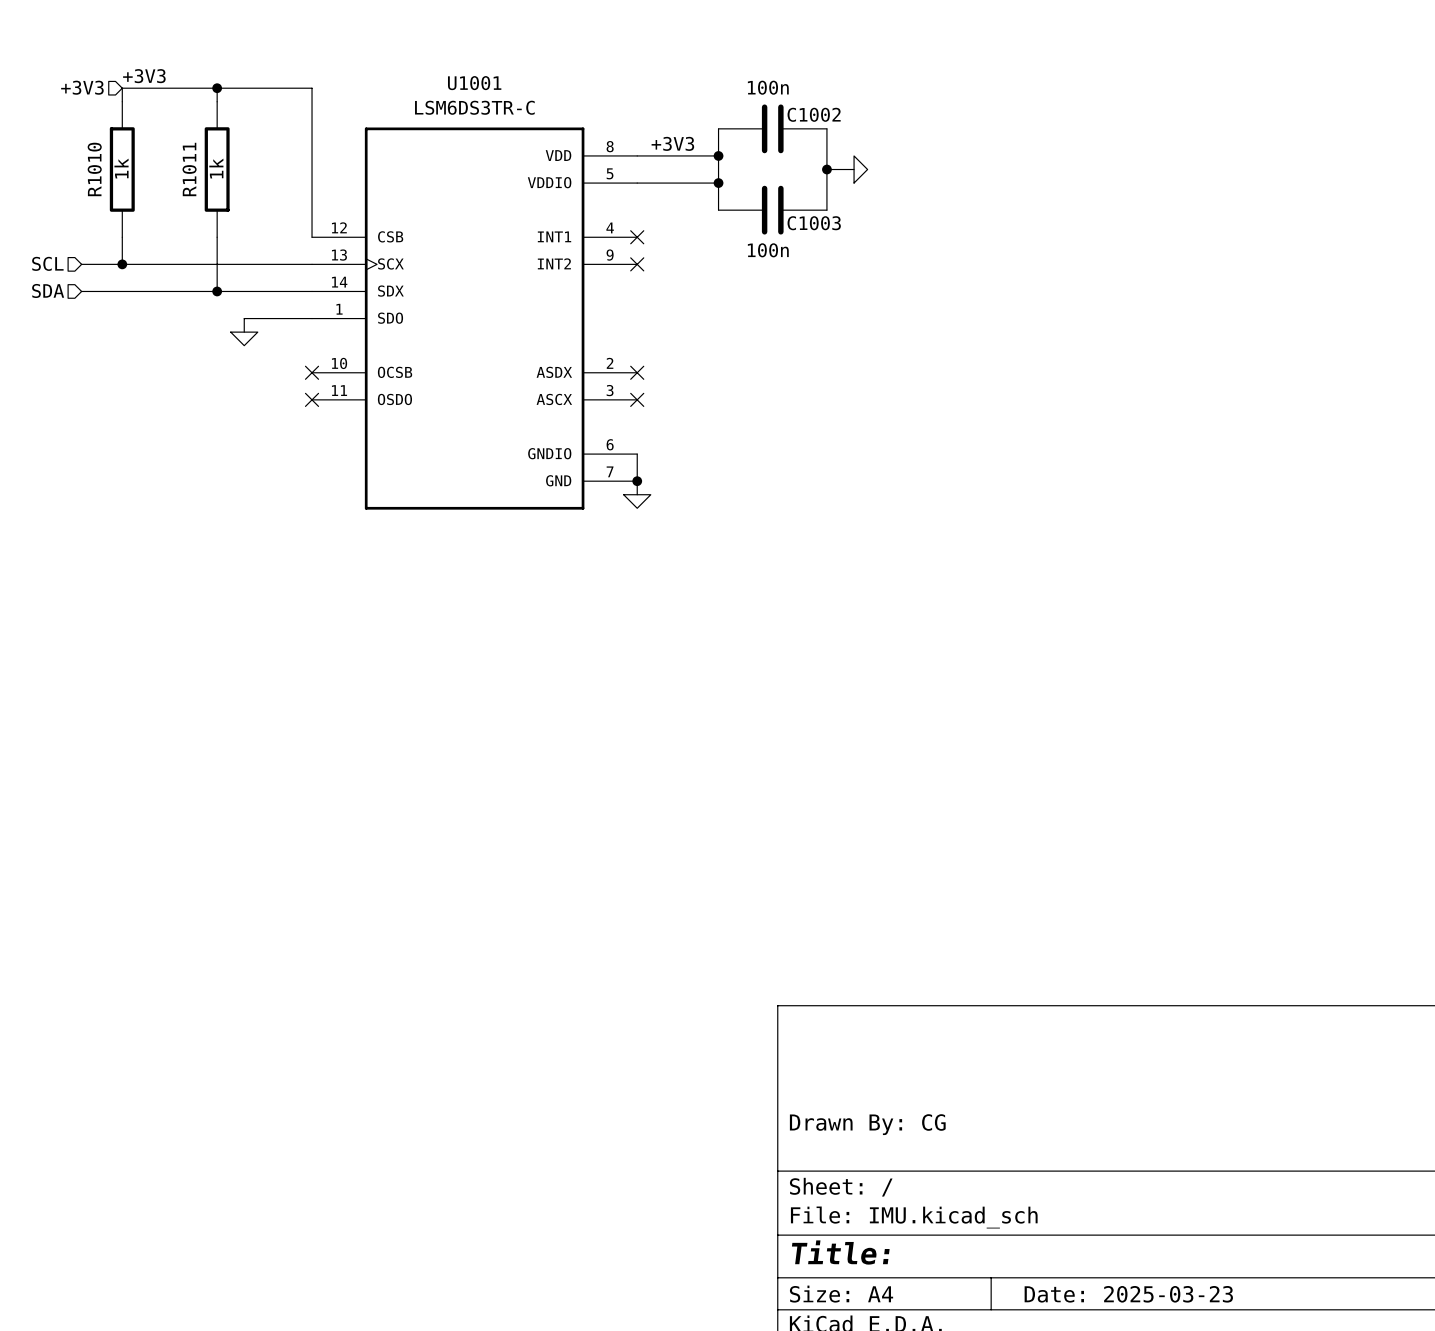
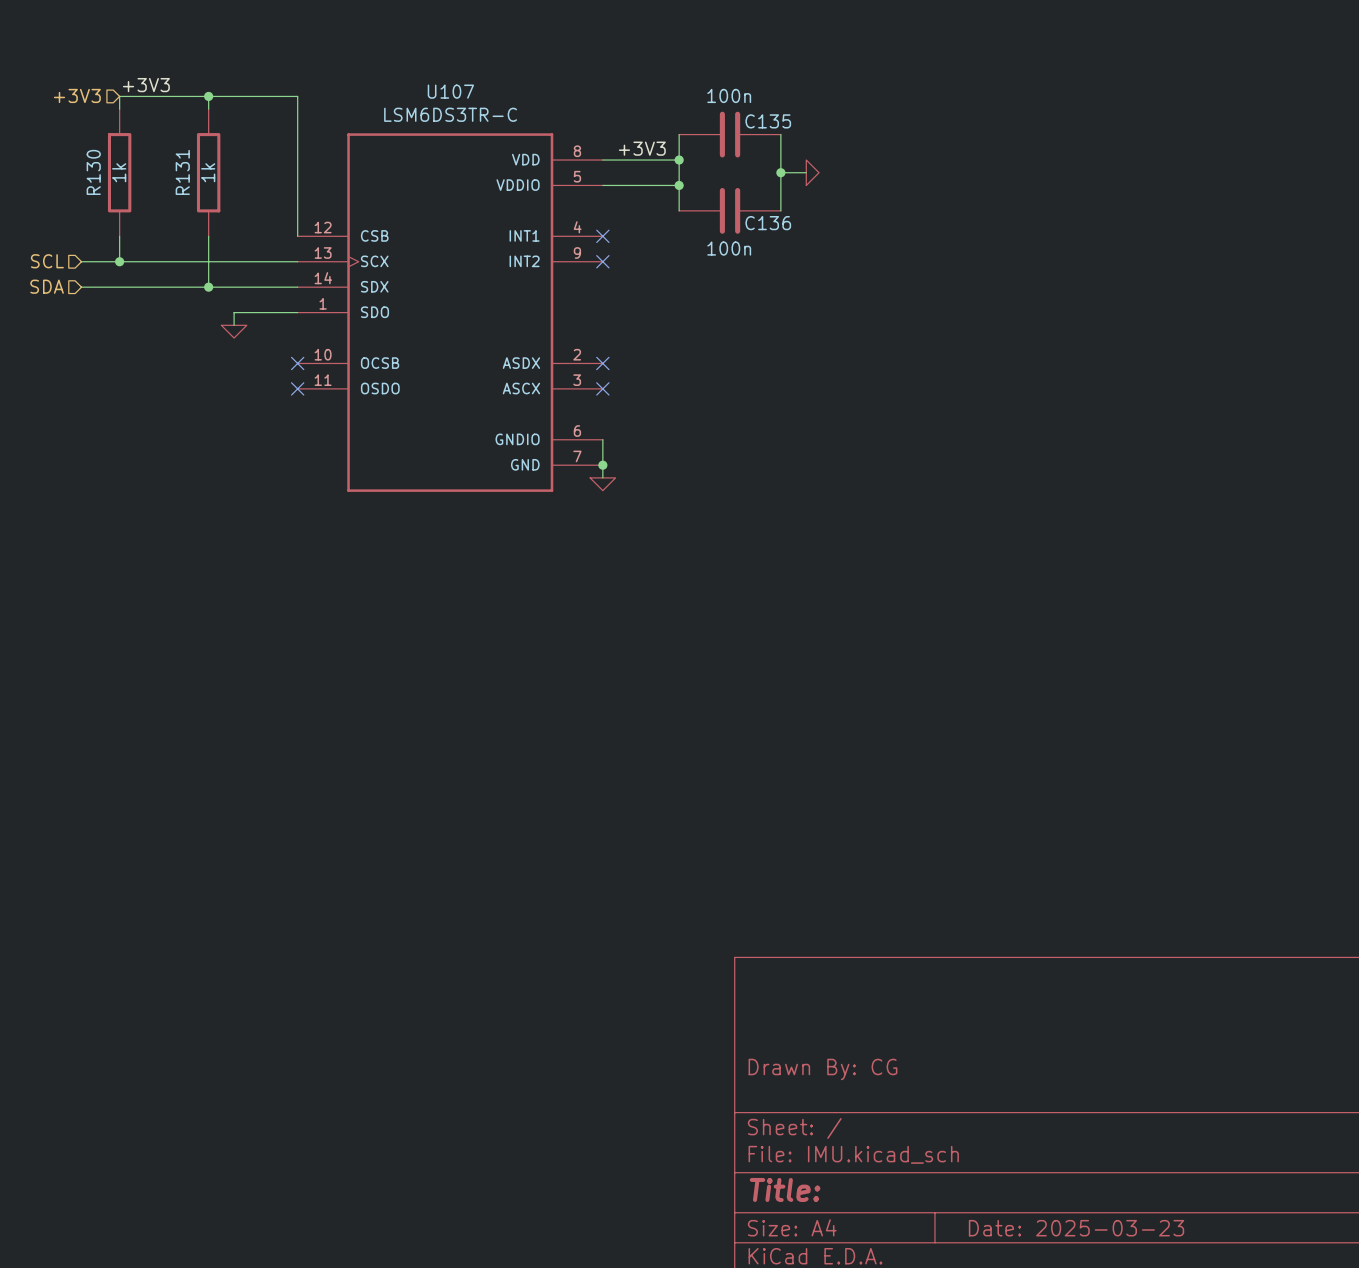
U1001 name: U1001 (474, 83) -> U107 (450, 91)
C1002 name: C1002 (814, 114) -> C135 (768, 121)
R1010 name: R1010 (94, 169) -> R130 (93, 172)
R1011 name: R1011 (189, 169) -> R131 (182, 172)
C1003 name: C1003 (814, 223) -> C136 (768, 223)

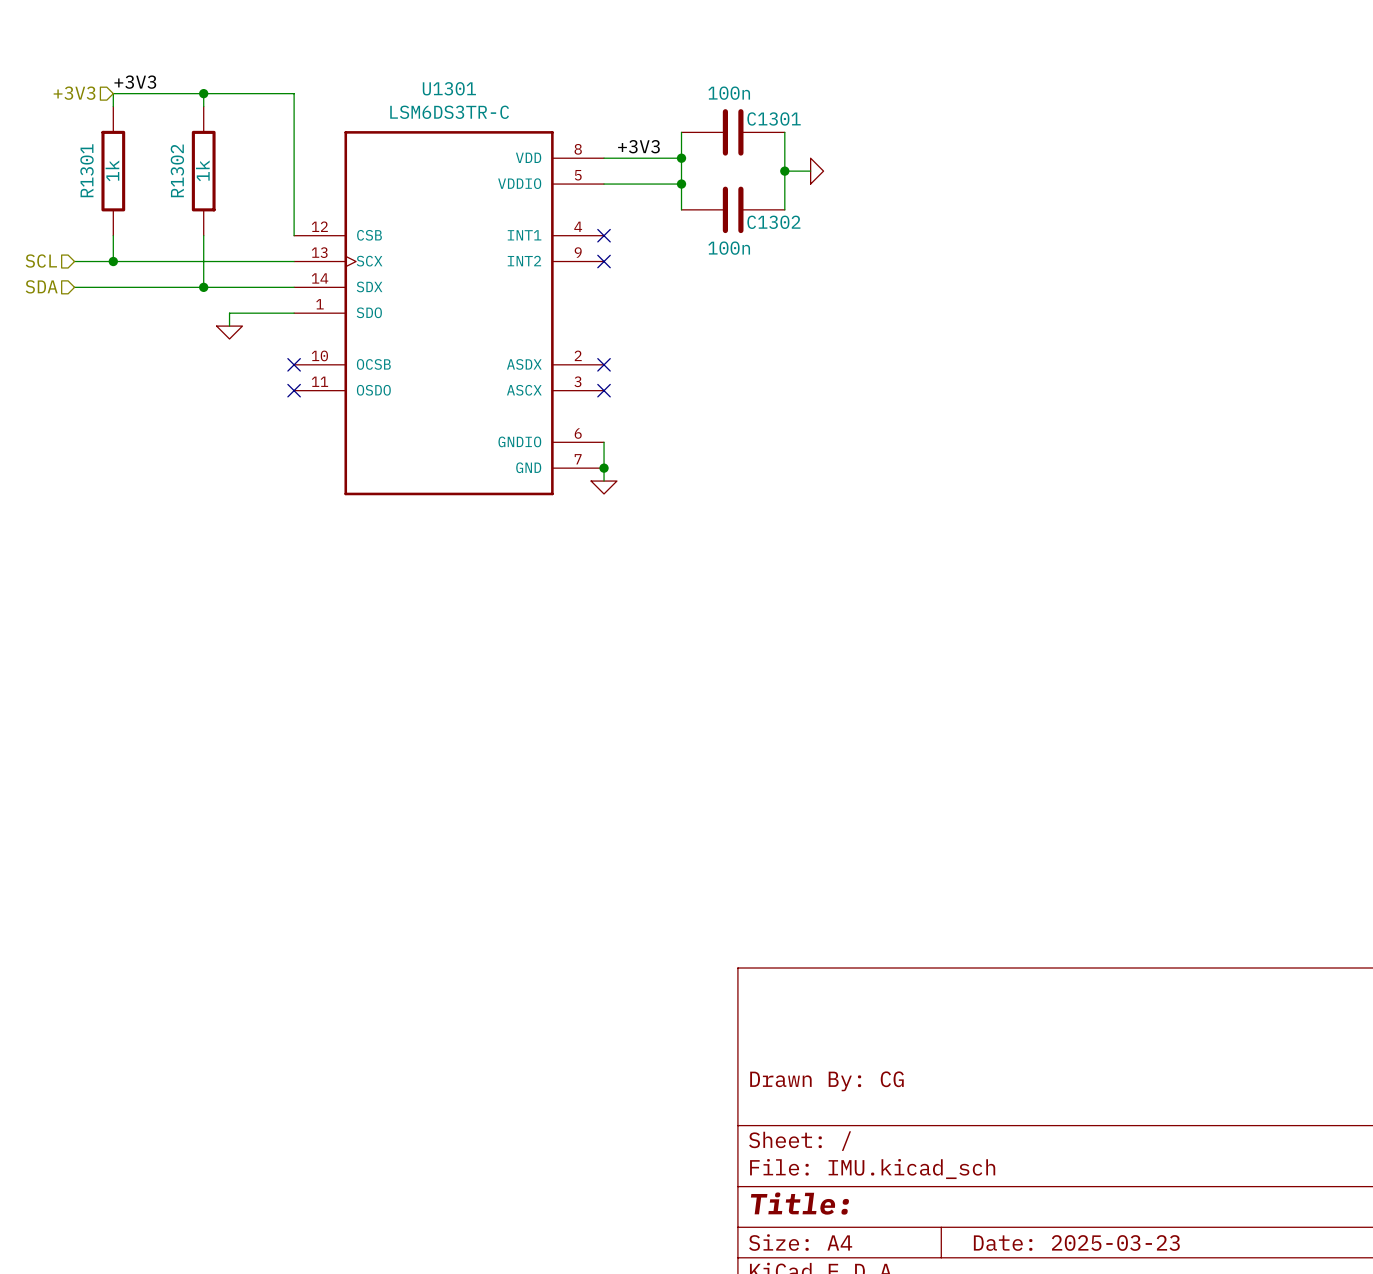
U107 name: U107 (450, 91) -> U1301 (449, 88)
C135 name: C135 (768, 121) -> C1301 (774, 118)
R130 name: R130 (93, 172) -> R1301 (87, 170)
R131 name: R131 (182, 172) -> R1302 (177, 170)
C136 name: C136 (768, 223) -> C1302 (773, 222)

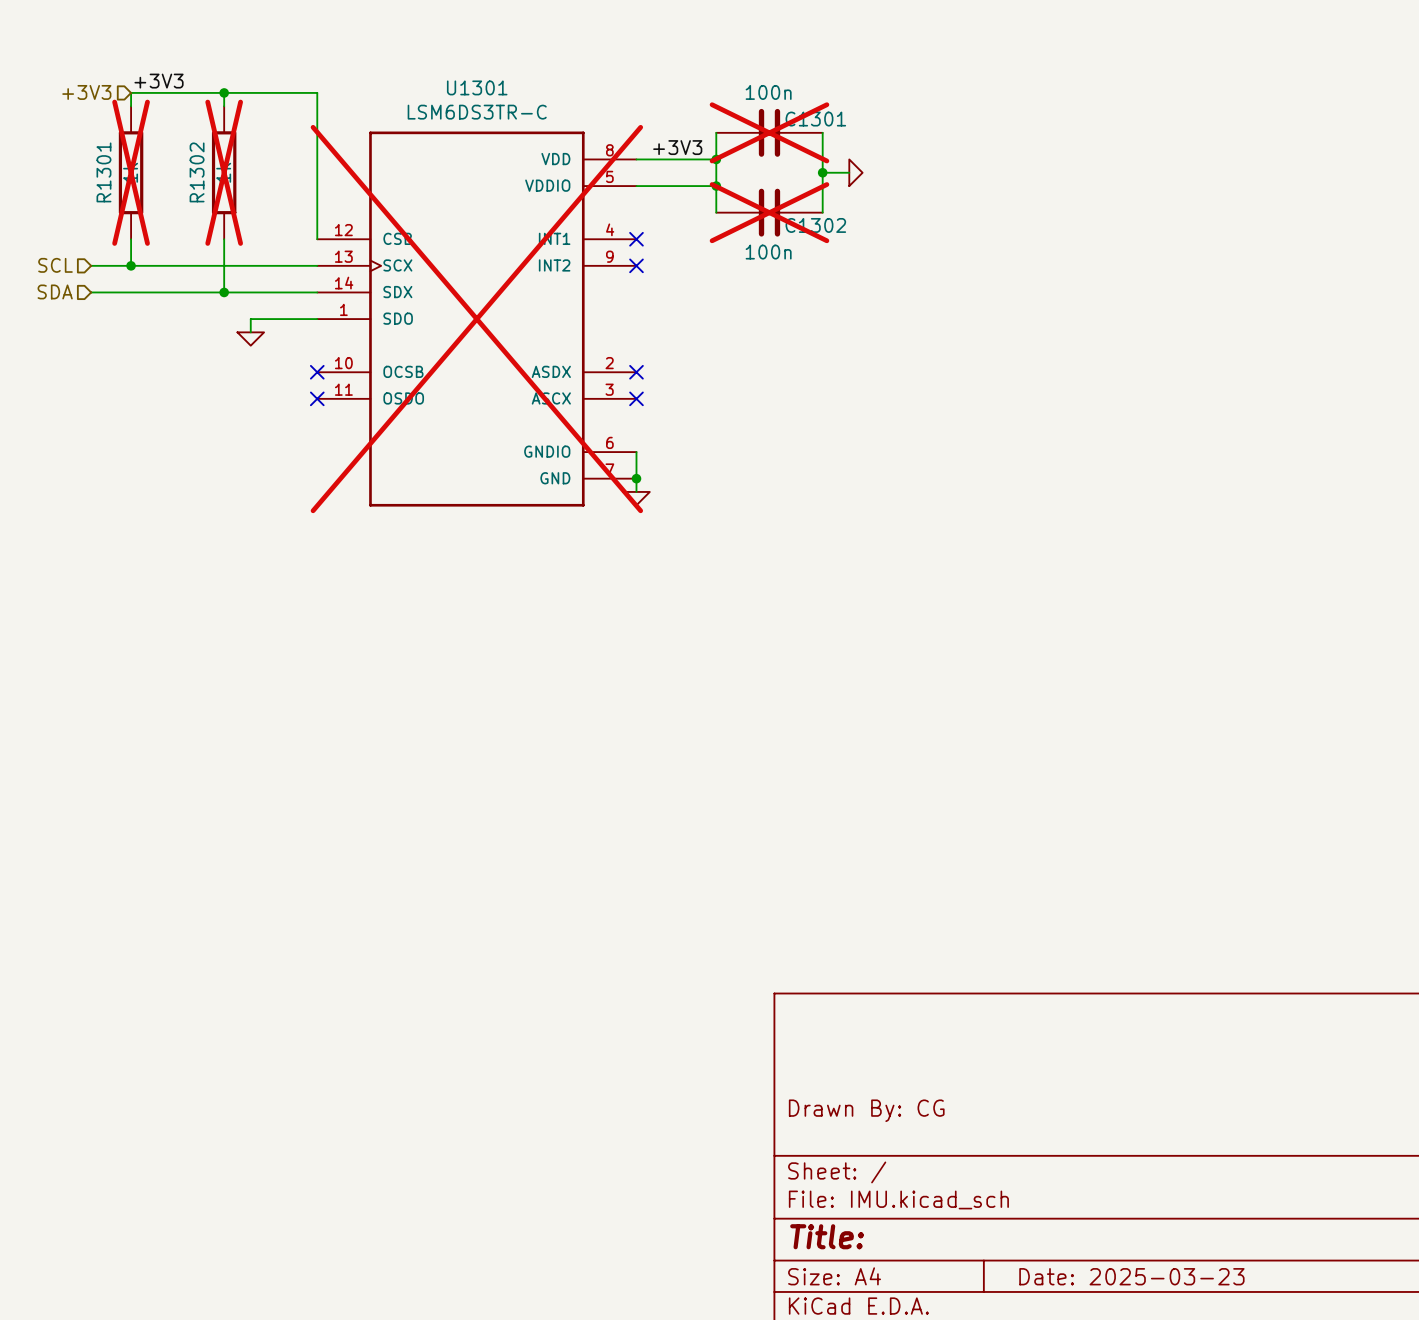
C1301 do-not-place cross: none -> (769, 132)
R1301 do-not-place cross: none -> (131, 172)
R1302 do-not-place cross: none -> (224, 172)
C1302 do-not-place cross: none -> (769, 212)
U1301 do-not-place cross: none -> (476, 319)

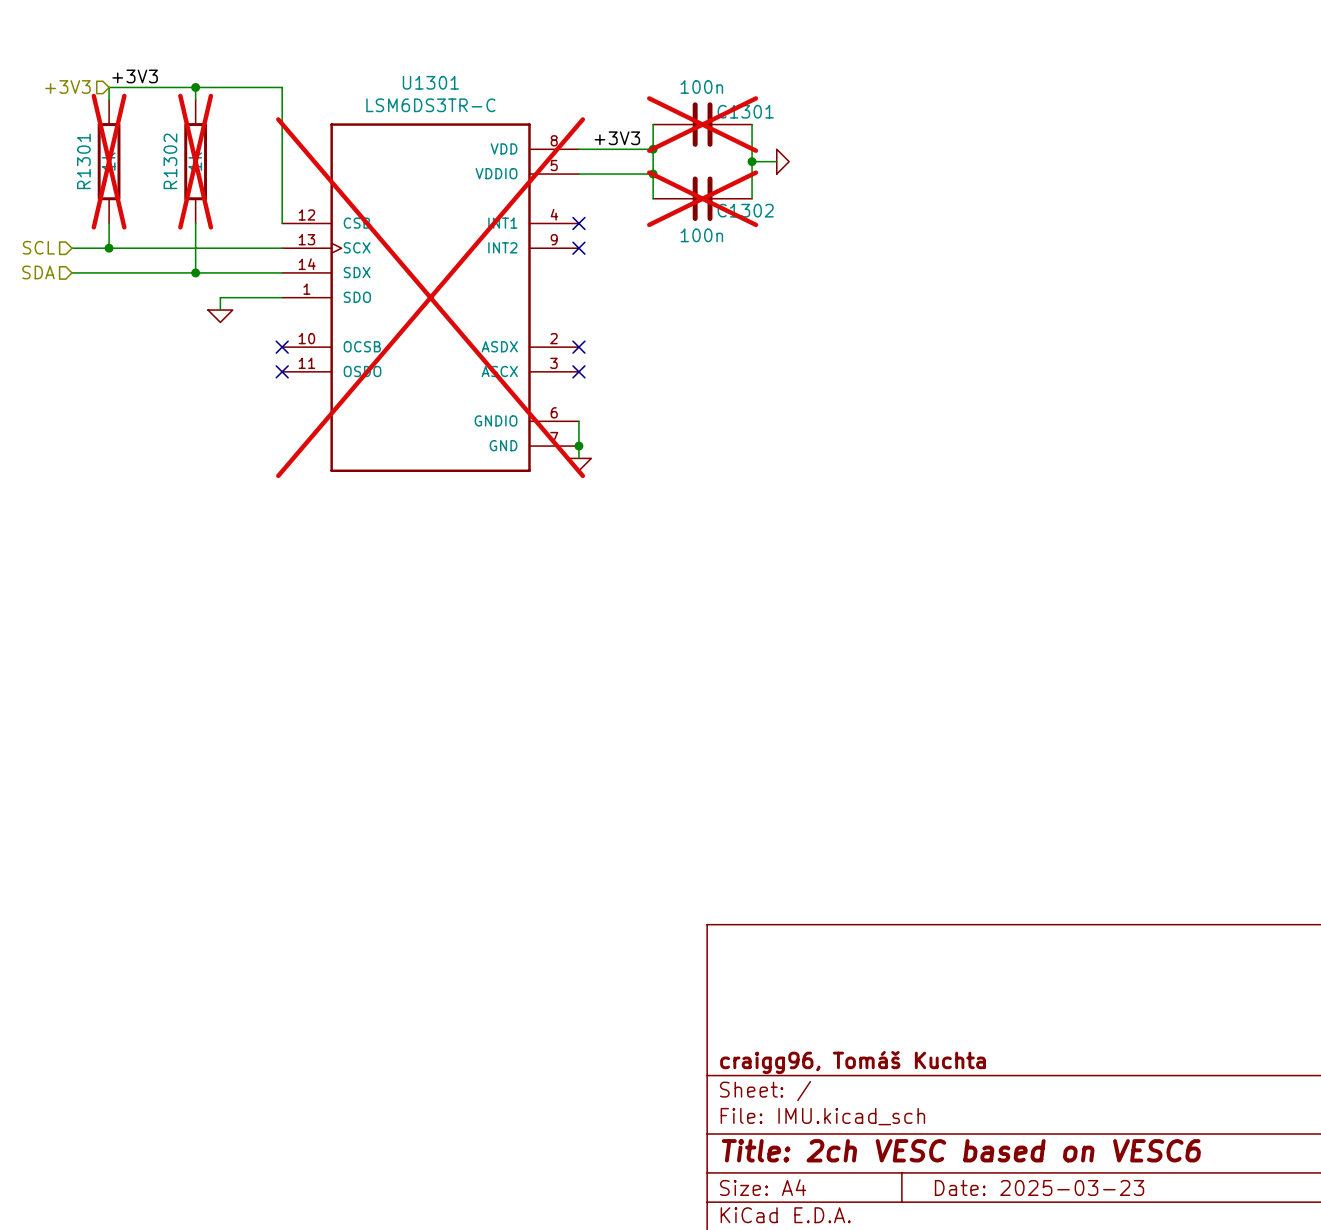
title block: Drawn By: CG (866, 1110) -> none
title block: none -> craigg96, Tomáš Kuchta (853, 1062)
title block: Title: (827, 1236) -> Title: 2ch VESC based on VESC6 (961, 1150)

